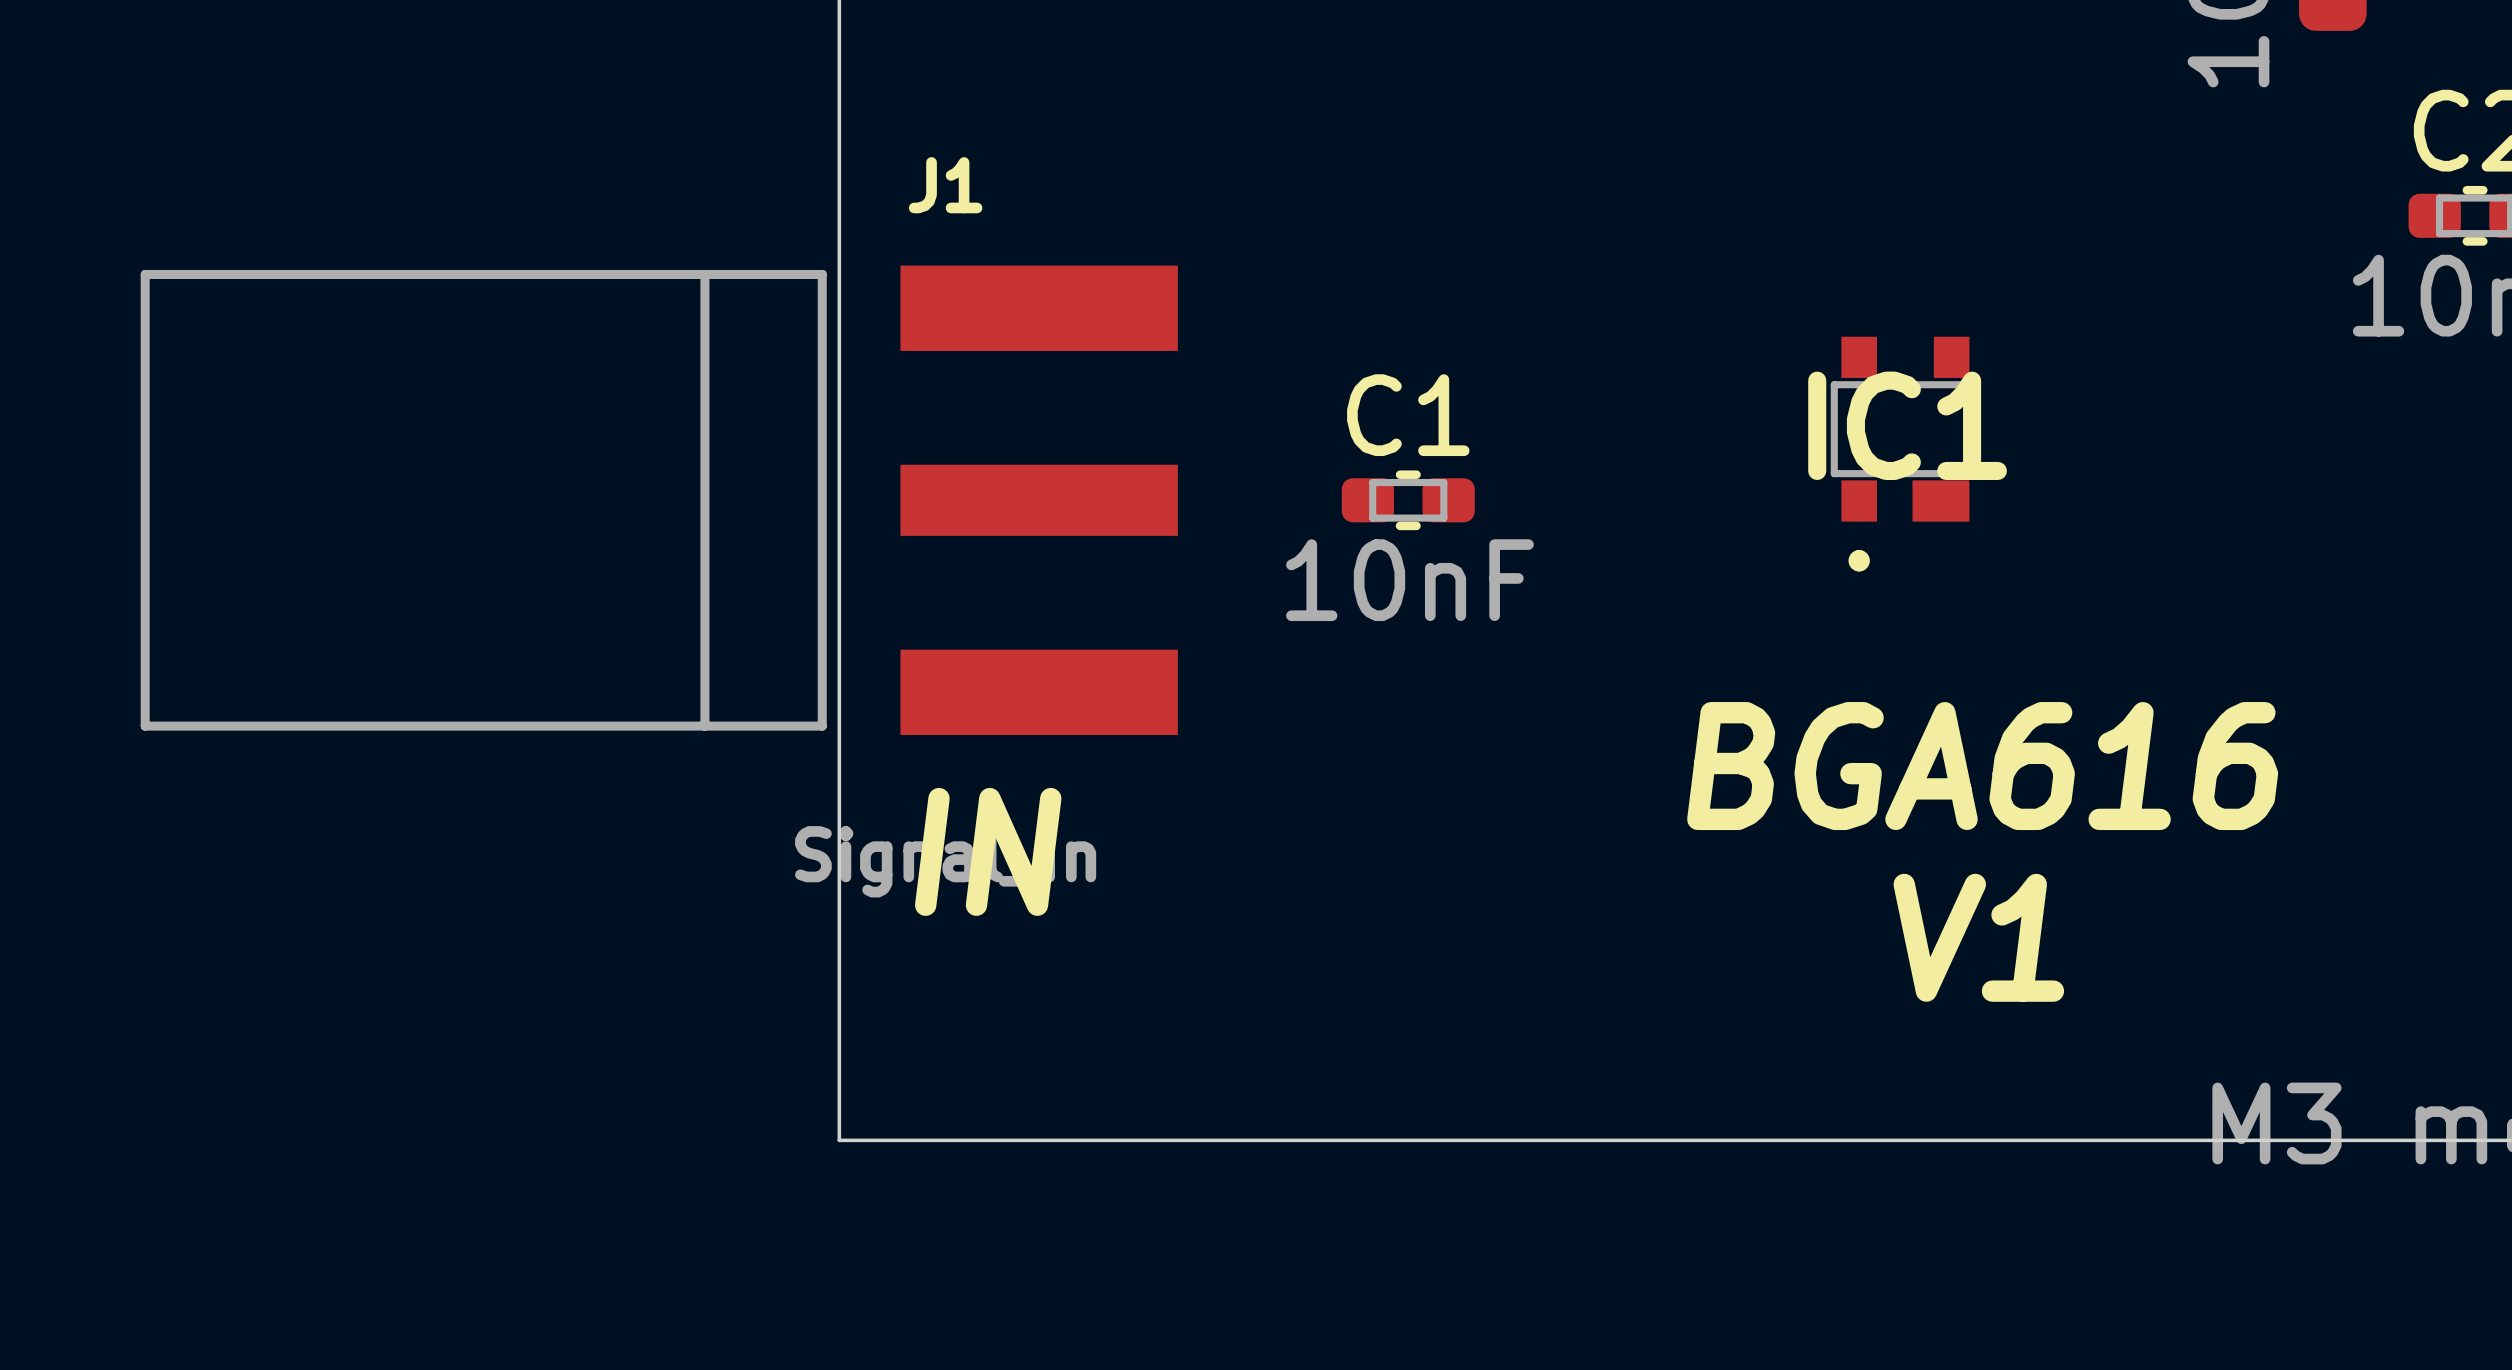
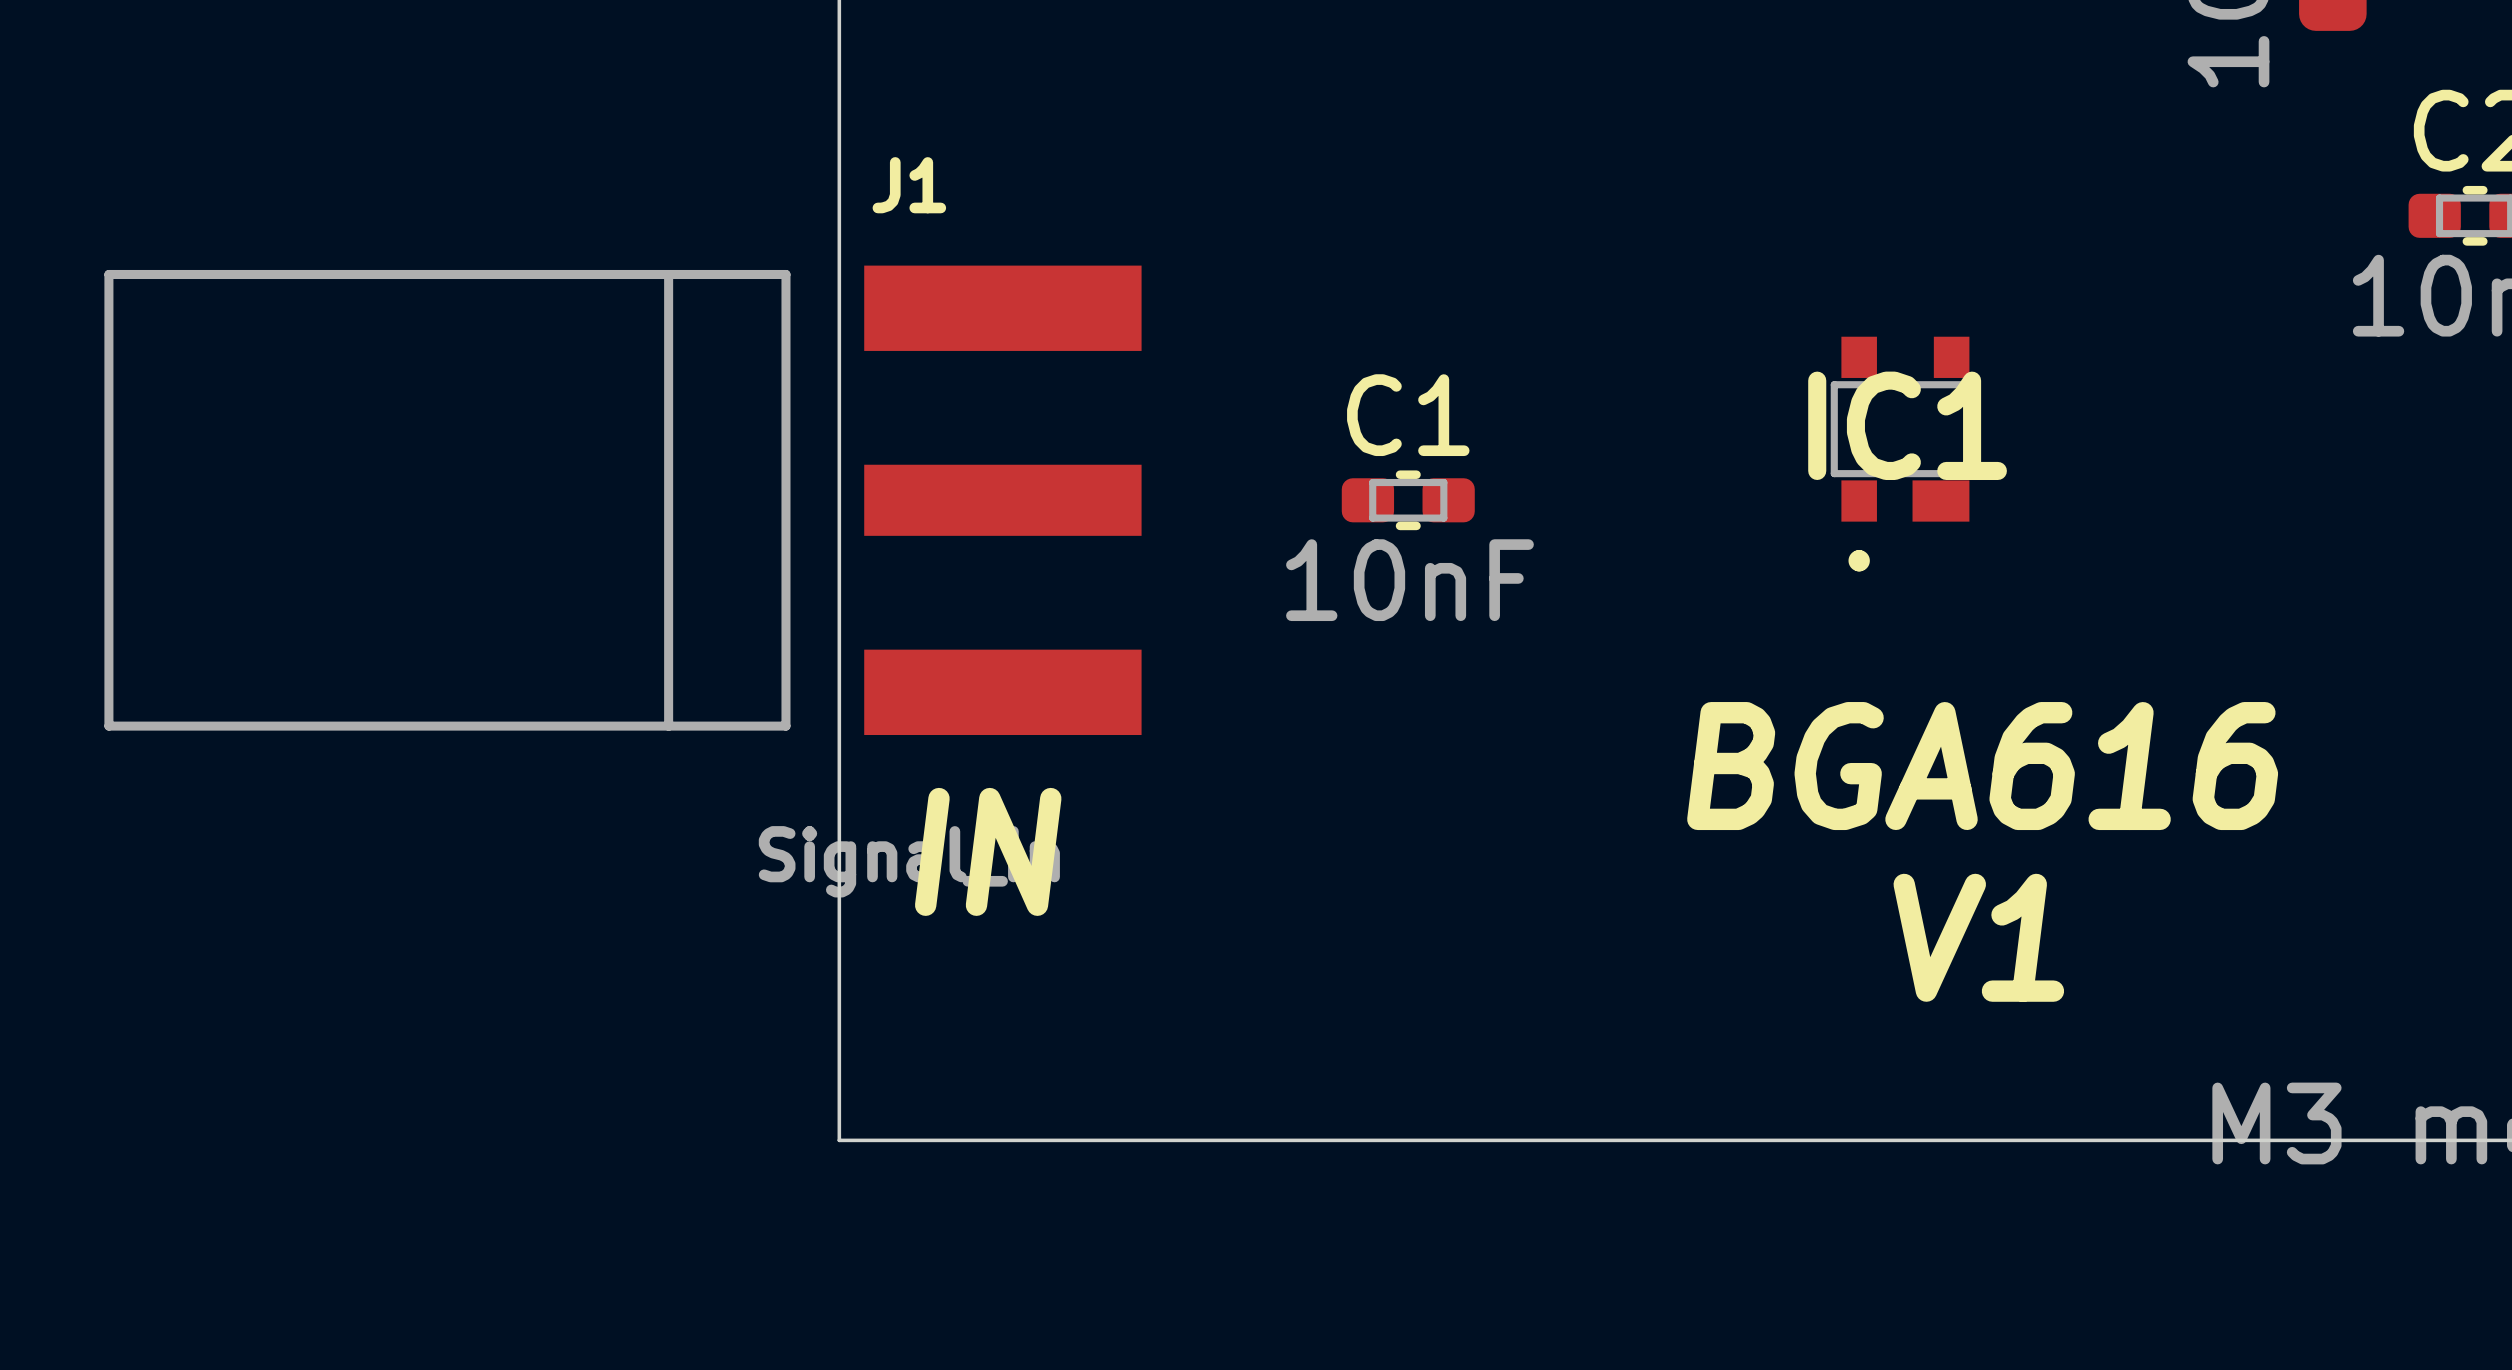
J1 position: (659, 500) -> (622, 500)

